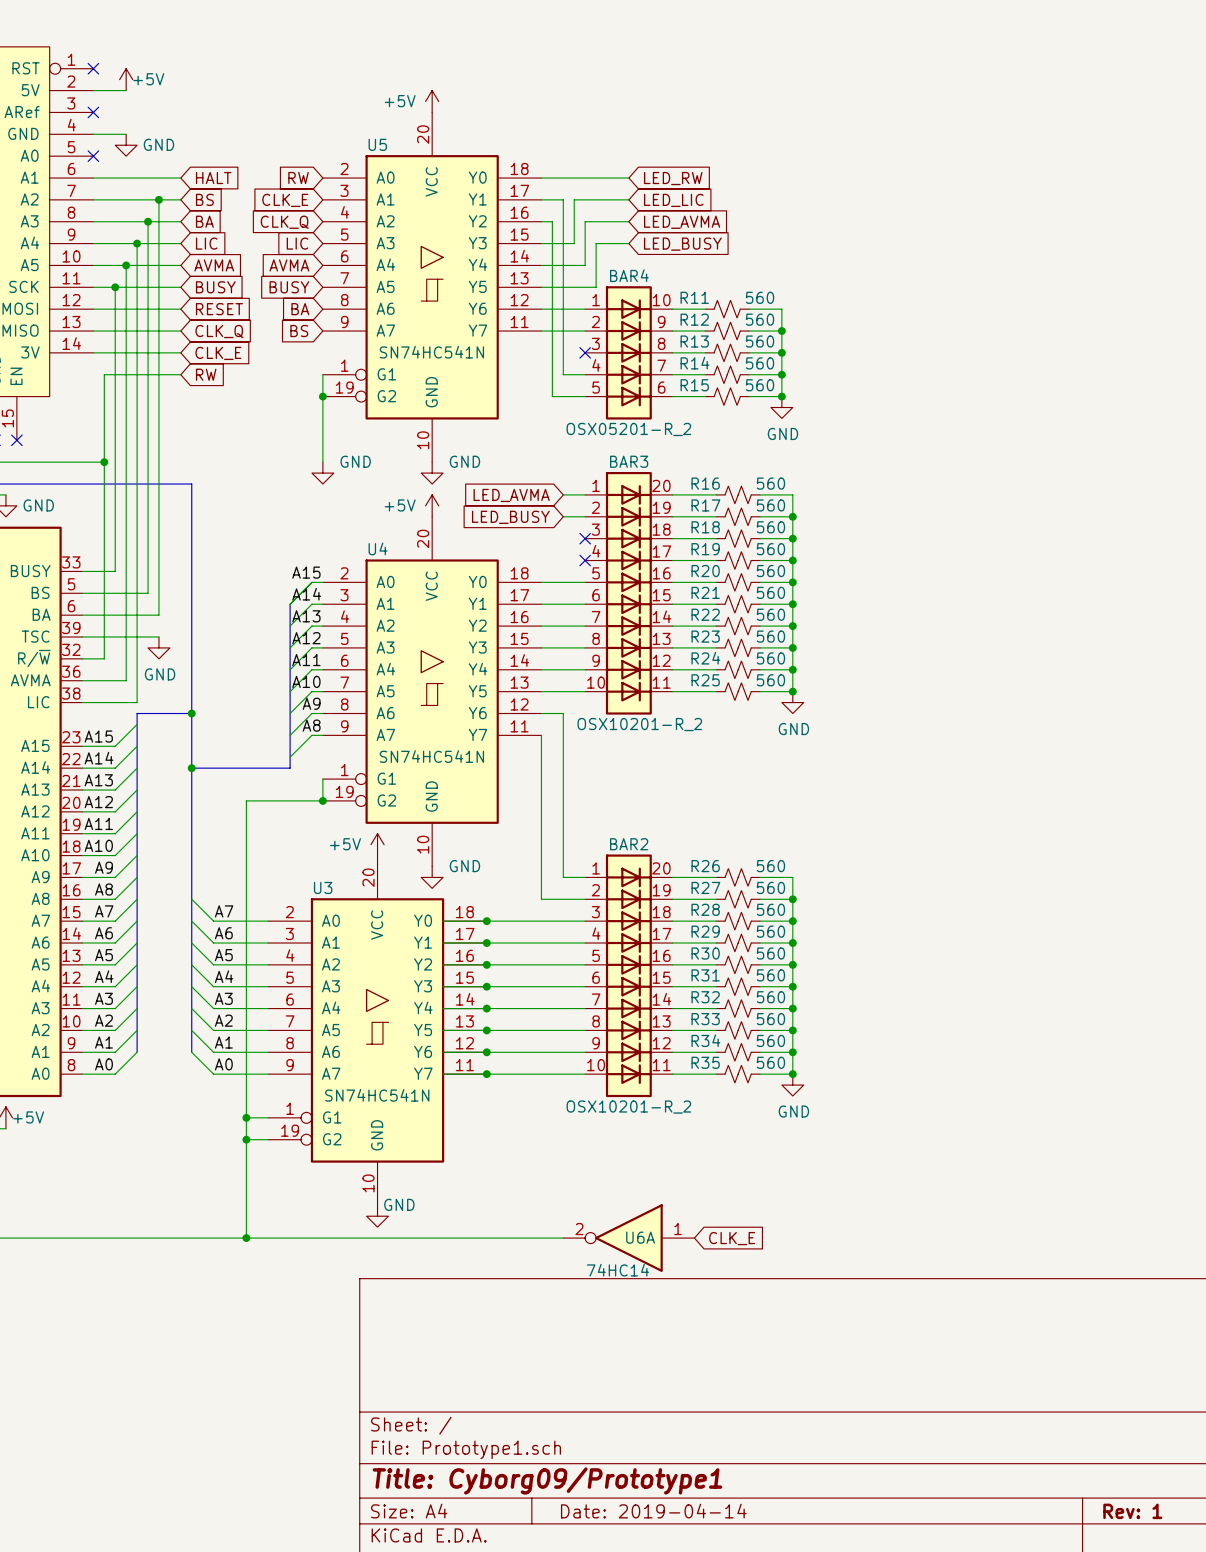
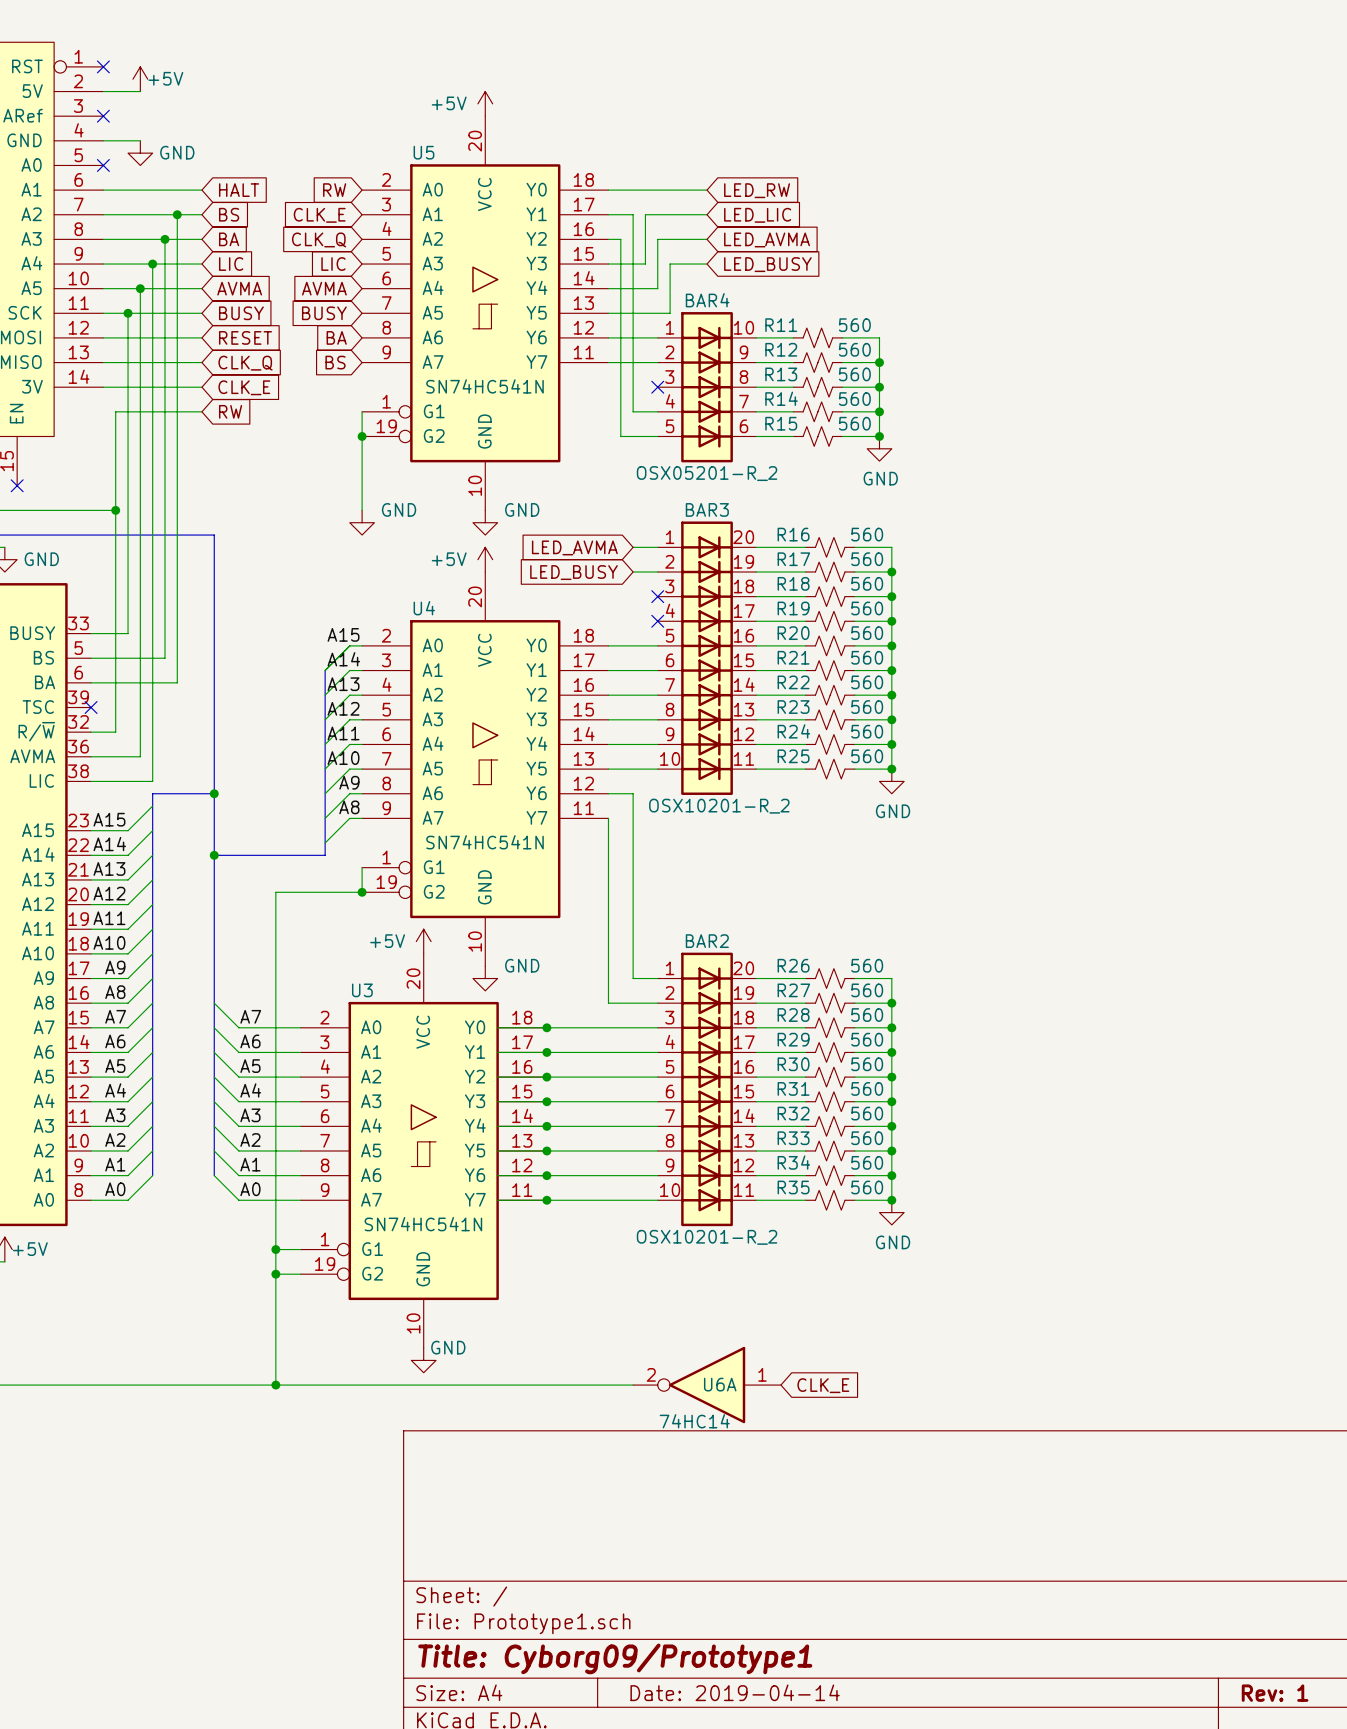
wire: (82, 637) (158, 637) -> none
no-connect mark: none -> (91, 707)
power symbol: GND (158, 647) -> none

